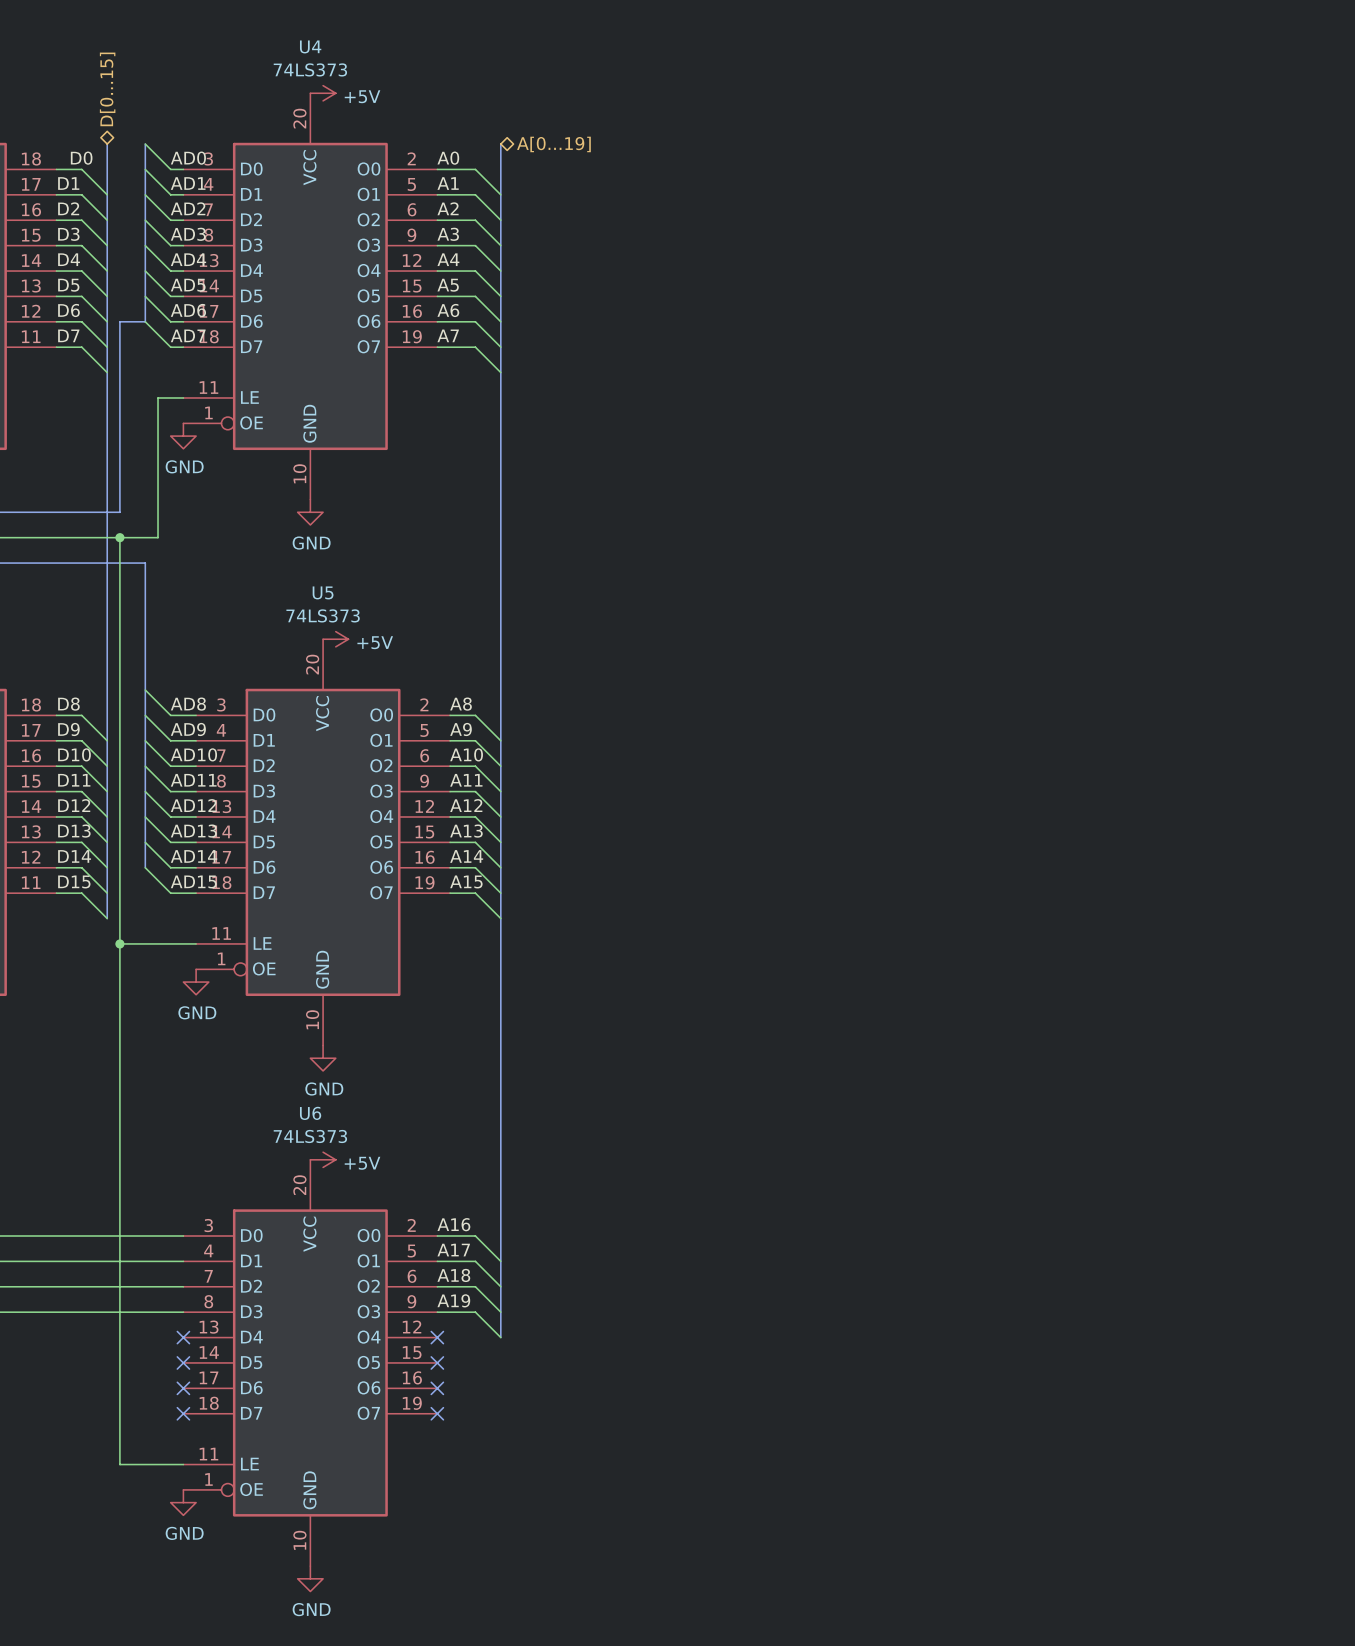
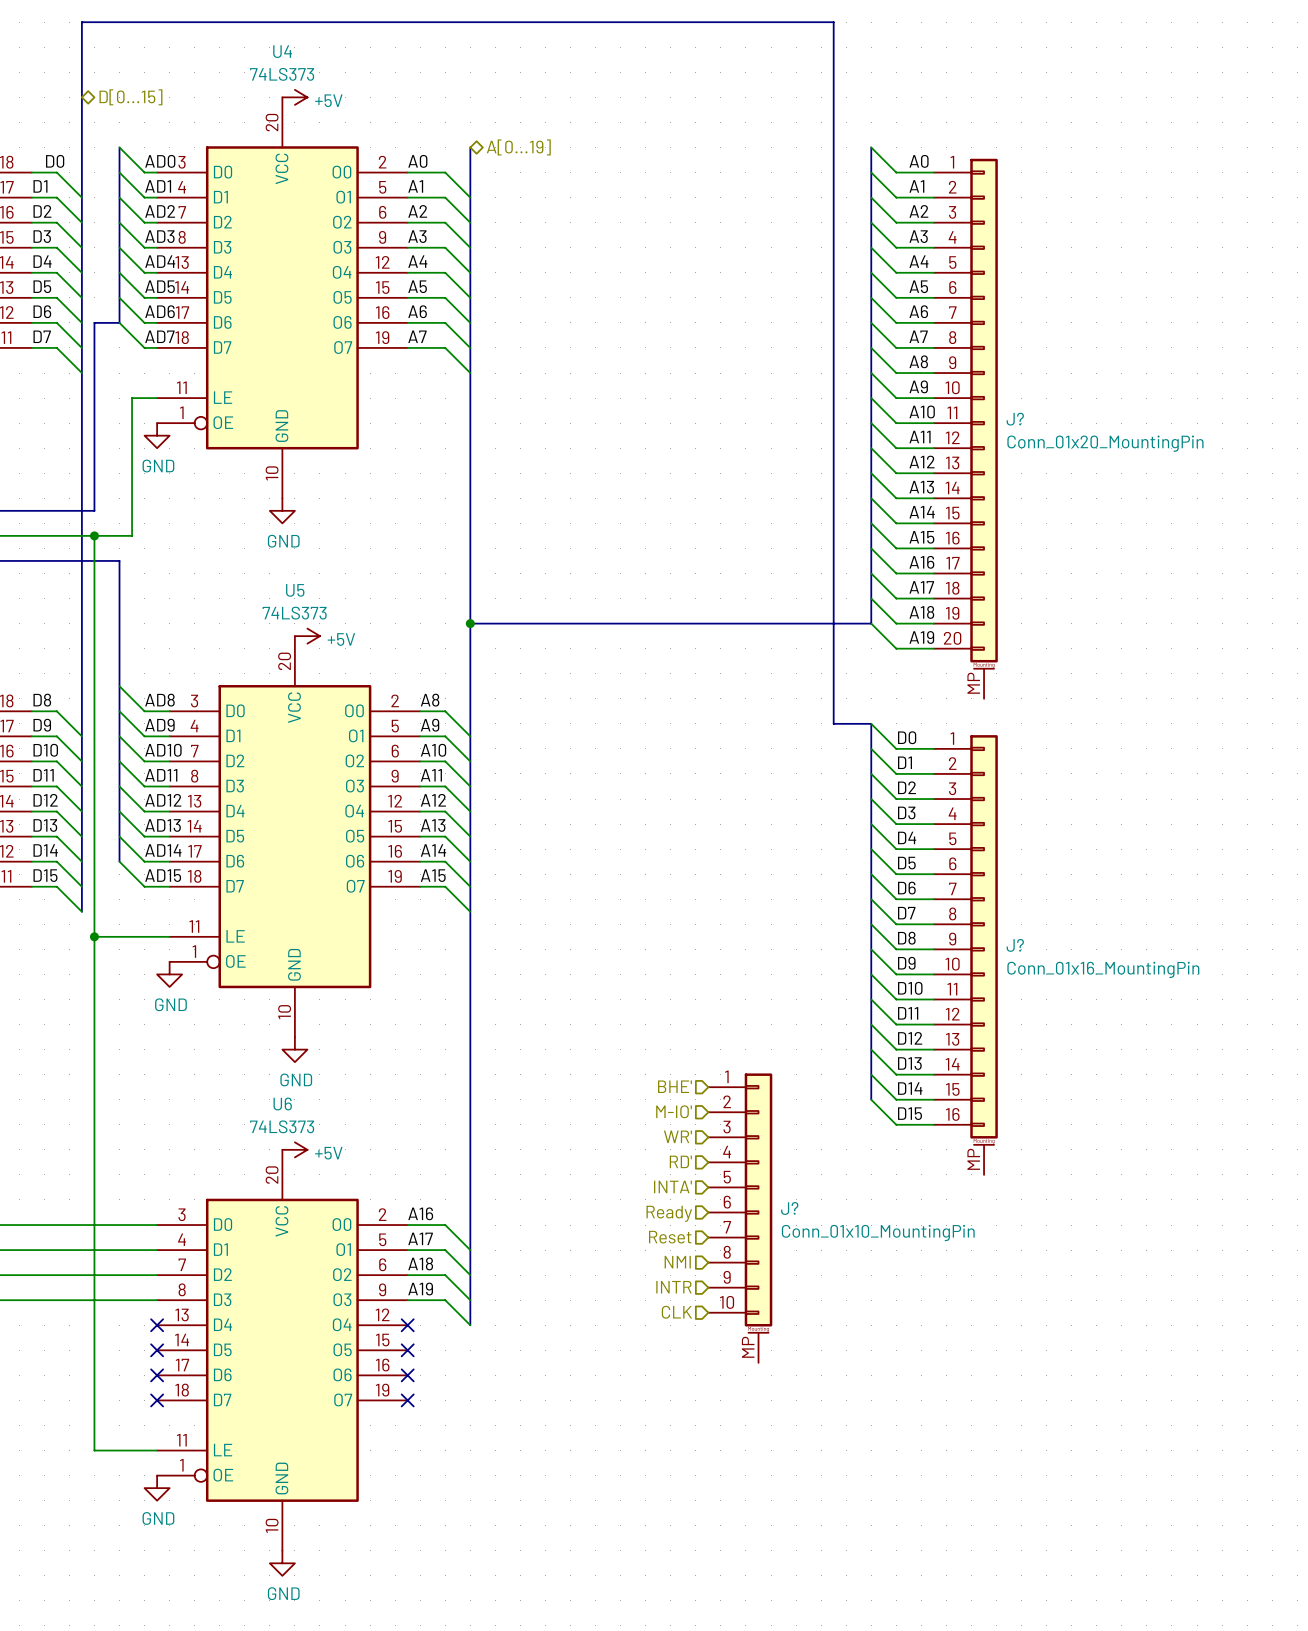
hierarchical label rotation: 0° (107, 89) -> 90° clockwise (130, 97)
bus: none -> (81, 147) (81, 22) (833, 22) (833, 723) (871, 723) (871, 1099)
wire: none -> (871, 147) (896, 172) (933, 172)
bus: none -> (871, 147) (871, 623) (470, 623)
label: none -> A0 (919, 161)
wire: none -> (871, 172) (896, 197) (933, 197)
label: none -> A1 (916, 186)
wire: none -> (871, 197) (896, 222) (933, 222)
label: none -> A2 (918, 211)
wire: none -> (871, 222) (896, 247) (933, 247)
label: none -> A3 (918, 236)
wire: none -> (871, 247) (896, 272) (933, 272)
label: none -> A4 (918, 261)
wire: none -> (871, 272) (896, 297) (933, 297)
label: none -> A5 (918, 286)
wire: none -> (871, 297) (896, 322) (933, 322)
label: none -> A6 (918, 311)
wire: none -> (871, 322) (896, 347) (933, 347)
label: none -> A7 (918, 336)
wire: none -> (871, 347) (896, 373) (933, 373)
label: none -> A8 (918, 361)
wire: none -> (871, 373) (896, 398) (933, 398)
label: none -> A9 (918, 386)
wire: none -> (871, 398) (896, 423) (933, 423)
label: none -> A10 (922, 411)
wire: none -> (871, 423) (896, 448) (933, 448)
J?: none -> Conn_01x20_MountingPin (965, 428)
label: none -> A11 (920, 437)
wire: none -> (871, 448) (896, 473) (933, 473)
label: none -> A12 (922, 462)
wire: none -> (871, 473) (896, 498) (933, 498)
label: none -> A13 (921, 487)
wire: none -> (871, 498) (896, 523) (933, 523)
label: none -> A14 (922, 512)
wire: none -> (871, 523) (896, 548) (933, 548)
label: none -> A15 (921, 537)
wire: none -> (871, 548) (896, 573) (933, 573)
label: none -> A16 (921, 562)
wire: none -> (871, 573) (896, 598) (933, 598)
label: none -> A17 (921, 587)
wire: none -> (871, 598) (896, 623) (933, 623)
label: none -> A18 (921, 612)
junction: none -> (470, 623)
wire: none -> (871, 623) (896, 648) (933, 648)
label: none -> A19 (921, 637)
wire: none -> (871, 723) (896, 748) (933, 748)
label: none -> D0 (907, 737)
wire: none -> (871, 748) (896, 773) (933, 773)
label: none -> D1 (905, 762)
wire: none -> (871, 773) (896, 799) (933, 799)
label: none -> D2 (906, 787)
wire: none -> (871, 799) (896, 824) (933, 824)
label: none -> D3 (906, 812)
wire: none -> (871, 824) (896, 849) (933, 849)
label: none -> D4 (907, 837)
wire: none -> (871, 849) (896, 874) (933, 874)
label: none -> D5 (906, 863)
wire: none -> (871, 874) (896, 899) (933, 899)
label: none -> D6 (906, 888)
wire: none -> (871, 899) (896, 924) (933, 924)
label: none -> D7 (906, 913)
wire: none -> (871, 924) (896, 949) (933, 949)
label: none -> D8 (906, 938)
wire: none -> (871, 949) (896, 974) (933, 974)
J?: none -> Conn_01x16_MountingPin (965, 955)
label: none -> D9 (906, 963)
wire: none -> (871, 974) (896, 999) (933, 999)
label: none -> D10 (910, 988)
wire: none -> (871, 999) (896, 1024) (933, 1024)
label: none -> D11 (908, 1013)
wire: none -> (871, 1024) (896, 1049) (933, 1049)
label: none -> D12 (910, 1038)
wire: none -> (871, 1049) (896, 1074) (933, 1074)
label: none -> D13 (909, 1063)
wire: none -> (871, 1074) (896, 1099) (933, 1099)
hierarchical label: none -> BHE' (675, 1086)
label: none -> D14 (910, 1088)
wire: none -> (871, 1099) (896, 1124) (933, 1124)
hierarchical label: none -> M-IO' (674, 1111)
label: none -> D15 (909, 1113)
hierarchical label: none -> WR' (677, 1136)
hierarchical label: none -> RD' (680, 1161)
hierarchical label: none -> INTA' (672, 1186)
hierarchical label: none -> Ready (669, 1213)
J?: none -> Conn_01x10_MountingPin (740, 1218)
hierarchical label: none -> Reset (670, 1237)
hierarchical label: none -> NMI (677, 1262)
hierarchical label: none -> INTR (673, 1287)
hierarchical label: none -> CLK (676, 1312)

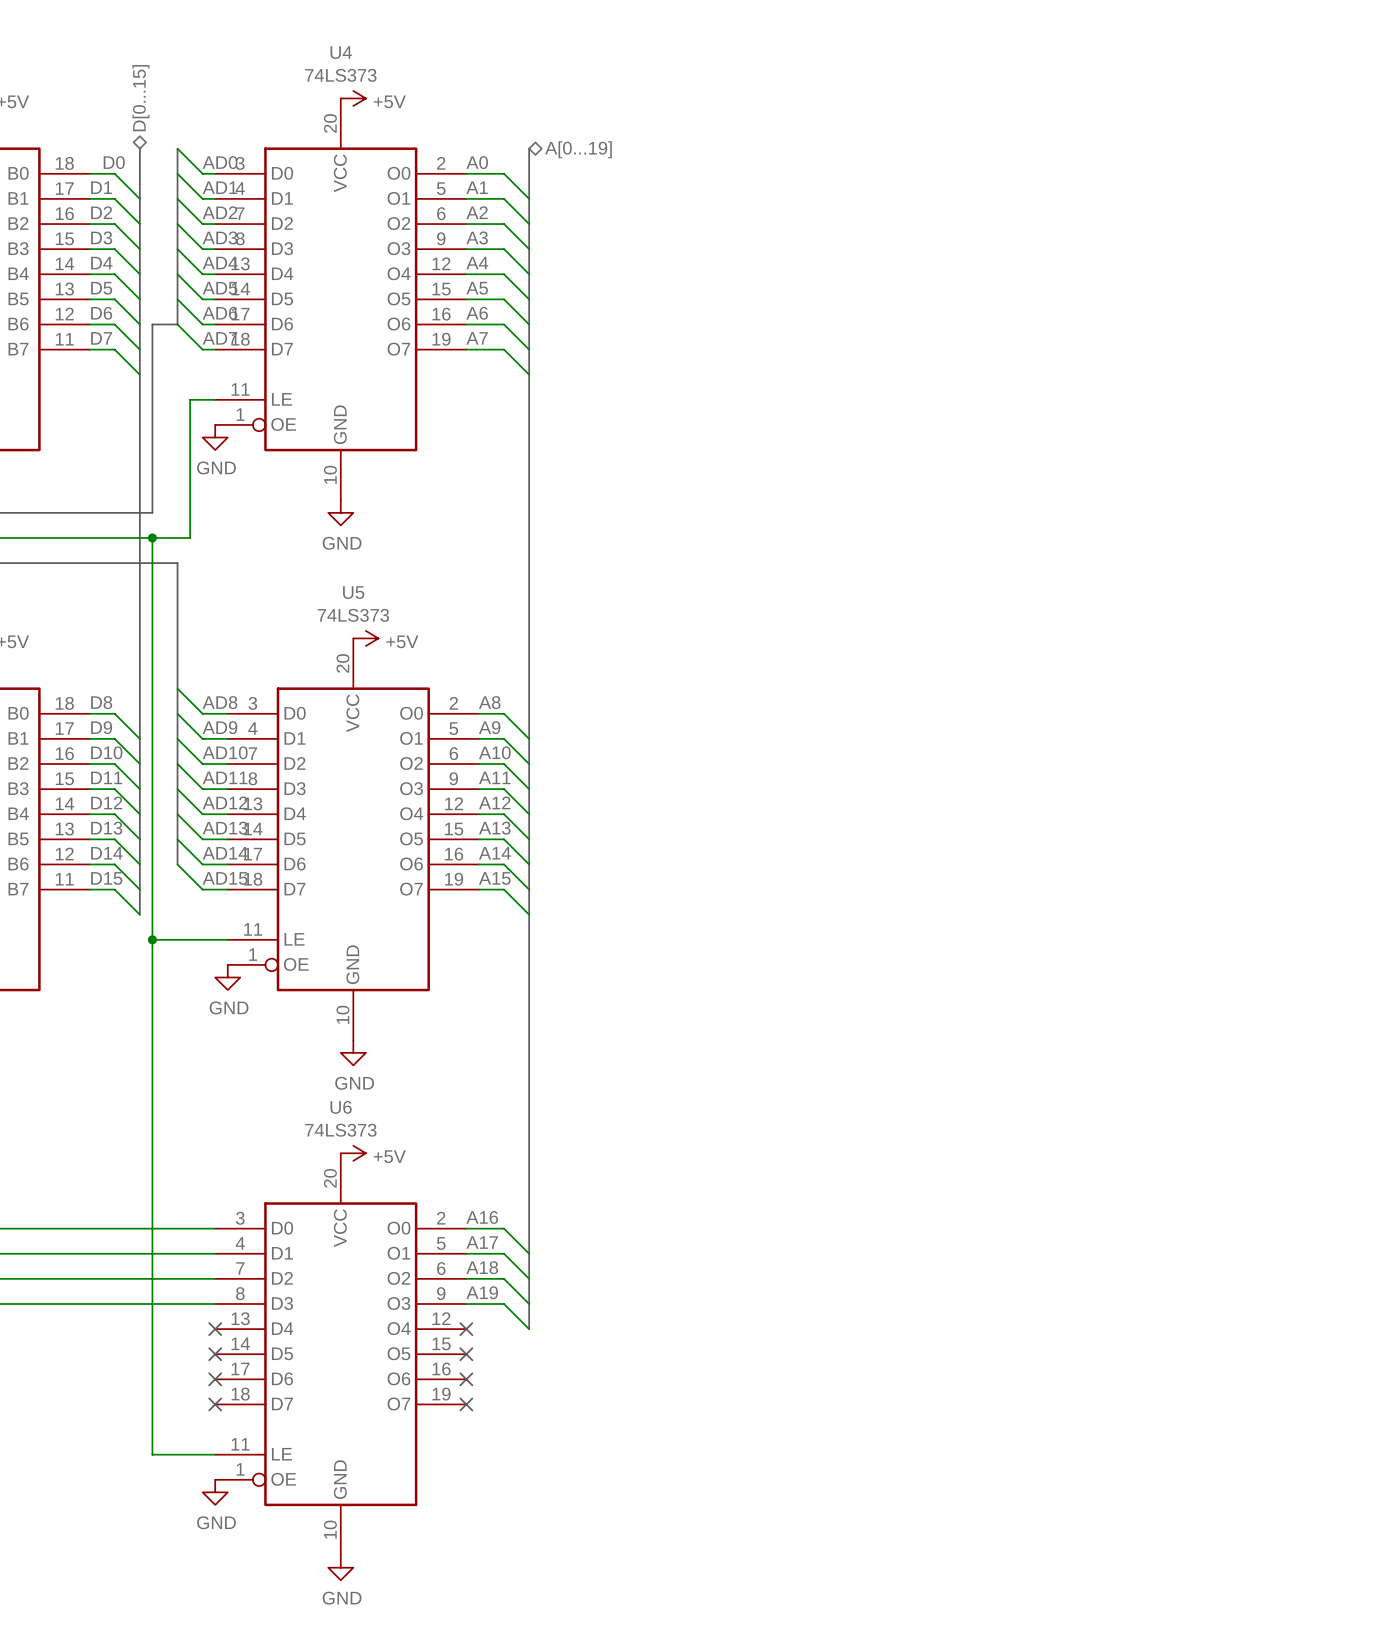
hierarchical label rotation: 0° (130, 97) -> 90° counterclockwise (140, 98)
bus: (81, 147) (81, 22) (833, 22) (833, 723) (871, 723) (871, 1099) -> none
wire: (871, 147) (896, 172) (933, 172) -> none
bus: (871, 147) (871, 623) (470, 623) -> none
label: A0 (919, 161) -> none
wire: (871, 172) (896, 197) (933, 197) -> none
label: A1 (916, 186) -> none
wire: (871, 197) (896, 222) (933, 222) -> none
label: A2 (918, 211) -> none
wire: (871, 222) (896, 247) (933, 247) -> none
label: A3 (918, 236) -> none
wire: (871, 247) (896, 272) (933, 272) -> none
label: A4 (918, 261) -> none
wire: (871, 272) (896, 297) (933, 297) -> none
label: A5 (918, 286) -> none
wire: (871, 297) (896, 322) (933, 322) -> none
label: A6 (918, 311) -> none
wire: (871, 322) (896, 347) (933, 347) -> none
label: A7 (918, 336) -> none
wire: (871, 347) (896, 373) (933, 373) -> none
label: A8 (918, 361) -> none
wire: (871, 373) (896, 398) (933, 398) -> none
label: A9 (918, 386) -> none
wire: (871, 398) (896, 423) (933, 423) -> none
label: A10 (922, 411) -> none
wire: (871, 423) (896, 448) (933, 448) -> none
J?: Conn_01x20_MountingPin (965, 428) -> none
label: A11 (920, 437) -> none
wire: (871, 448) (896, 473) (933, 473) -> none
label: A12 (922, 462) -> none
wire: (871, 473) (896, 498) (933, 498) -> none
label: A13 (921, 487) -> none
wire: (871, 498) (896, 523) (933, 523) -> none
label: A14 (922, 512) -> none
wire: (871, 523) (896, 548) (933, 548) -> none
label: A15 (921, 537) -> none
wire: (871, 548) (896, 573) (933, 573) -> none
label: A16 (921, 562) -> none
wire: (871, 573) (896, 598) (933, 598) -> none
label: A17 (921, 587) -> none
wire: (871, 598) (896, 623) (933, 623) -> none
label: A18 (921, 612) -> none
junction: (470, 623) -> none
wire: (871, 623) (896, 648) (933, 648) -> none
label: A19 (921, 637) -> none
wire: (871, 723) (896, 748) (933, 748) -> none
label: D0 (907, 737) -> none
wire: (871, 748) (896, 773) (933, 773) -> none
label: D1 (905, 762) -> none
wire: (871, 773) (896, 799) (933, 799) -> none
label: D2 (906, 787) -> none
wire: (871, 799) (896, 824) (933, 824) -> none
label: D3 (906, 812) -> none
wire: (871, 824) (896, 849) (933, 849) -> none
label: D4 (907, 837) -> none
wire: (871, 849) (896, 874) (933, 874) -> none
label: D5 (906, 863) -> none
wire: (871, 874) (896, 899) (933, 899) -> none
label: D6 (906, 888) -> none
wire: (871, 899) (896, 924) (933, 924) -> none
label: D7 (906, 913) -> none
wire: (871, 924) (896, 949) (933, 949) -> none
label: D8 (906, 938) -> none
wire: (871, 949) (896, 974) (933, 974) -> none
J?: Conn_01x16_MountingPin (965, 955) -> none
label: D9 (906, 963) -> none
wire: (871, 974) (896, 999) (933, 999) -> none
label: D10 (910, 988) -> none
wire: (871, 999) (896, 1024) (933, 1024) -> none
label: D11 (908, 1013) -> none
wire: (871, 1024) (896, 1049) (933, 1049) -> none
label: D12 (910, 1038) -> none
wire: (871, 1049) (896, 1074) (933, 1074) -> none
label: D13 (909, 1063) -> none
wire: (871, 1074) (896, 1099) (933, 1099) -> none
hierarchical label: BHE' (675, 1086) -> none
label: D14 (910, 1088) -> none
wire: (871, 1099) (896, 1124) (933, 1124) -> none
hierarchical label: M-IO' (674, 1111) -> none
label: D15 (909, 1113) -> none
hierarchical label: WR' (677, 1136) -> none
hierarchical label: RD' (680, 1161) -> none
hierarchical label: INTA' (672, 1186) -> none
hierarchical label: Ready (669, 1213) -> none
J?: Conn_01x10_MountingPin (740, 1218) -> none
hierarchical label: Reset (670, 1237) -> none
hierarchical label: NMI (677, 1262) -> none
hierarchical label: INTR (673, 1287) -> none
hierarchical label: CLK (676, 1312) -> none

